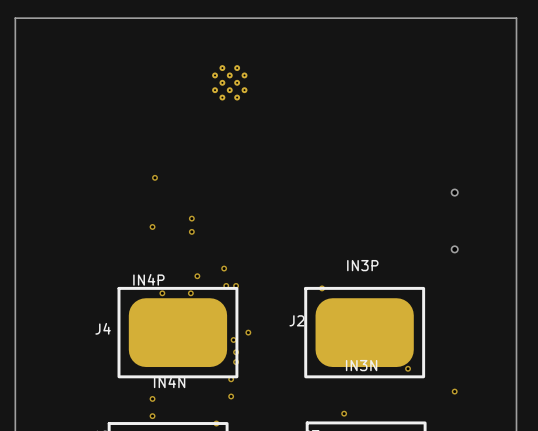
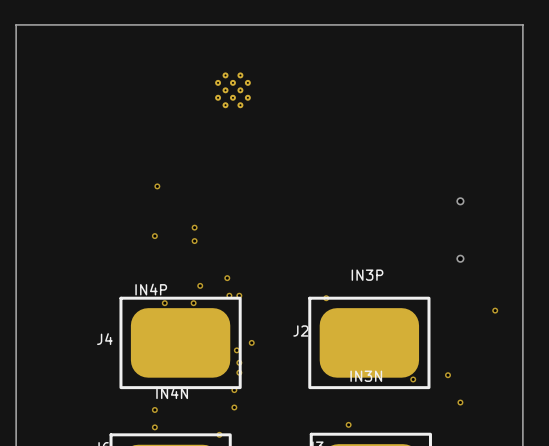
via: none -> (495, 310)
via: none -> (447, 375)

